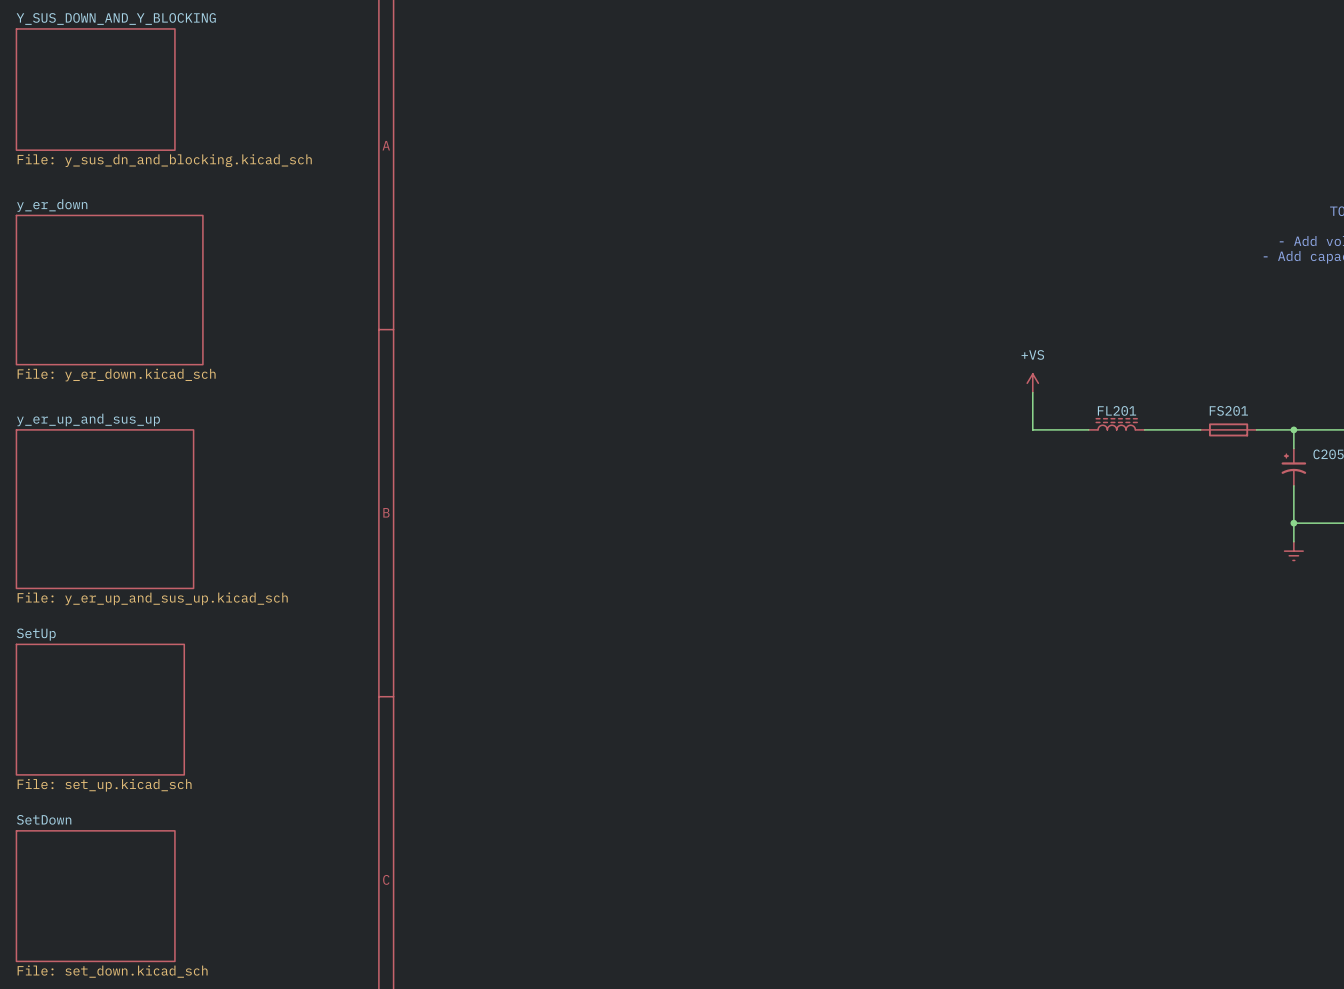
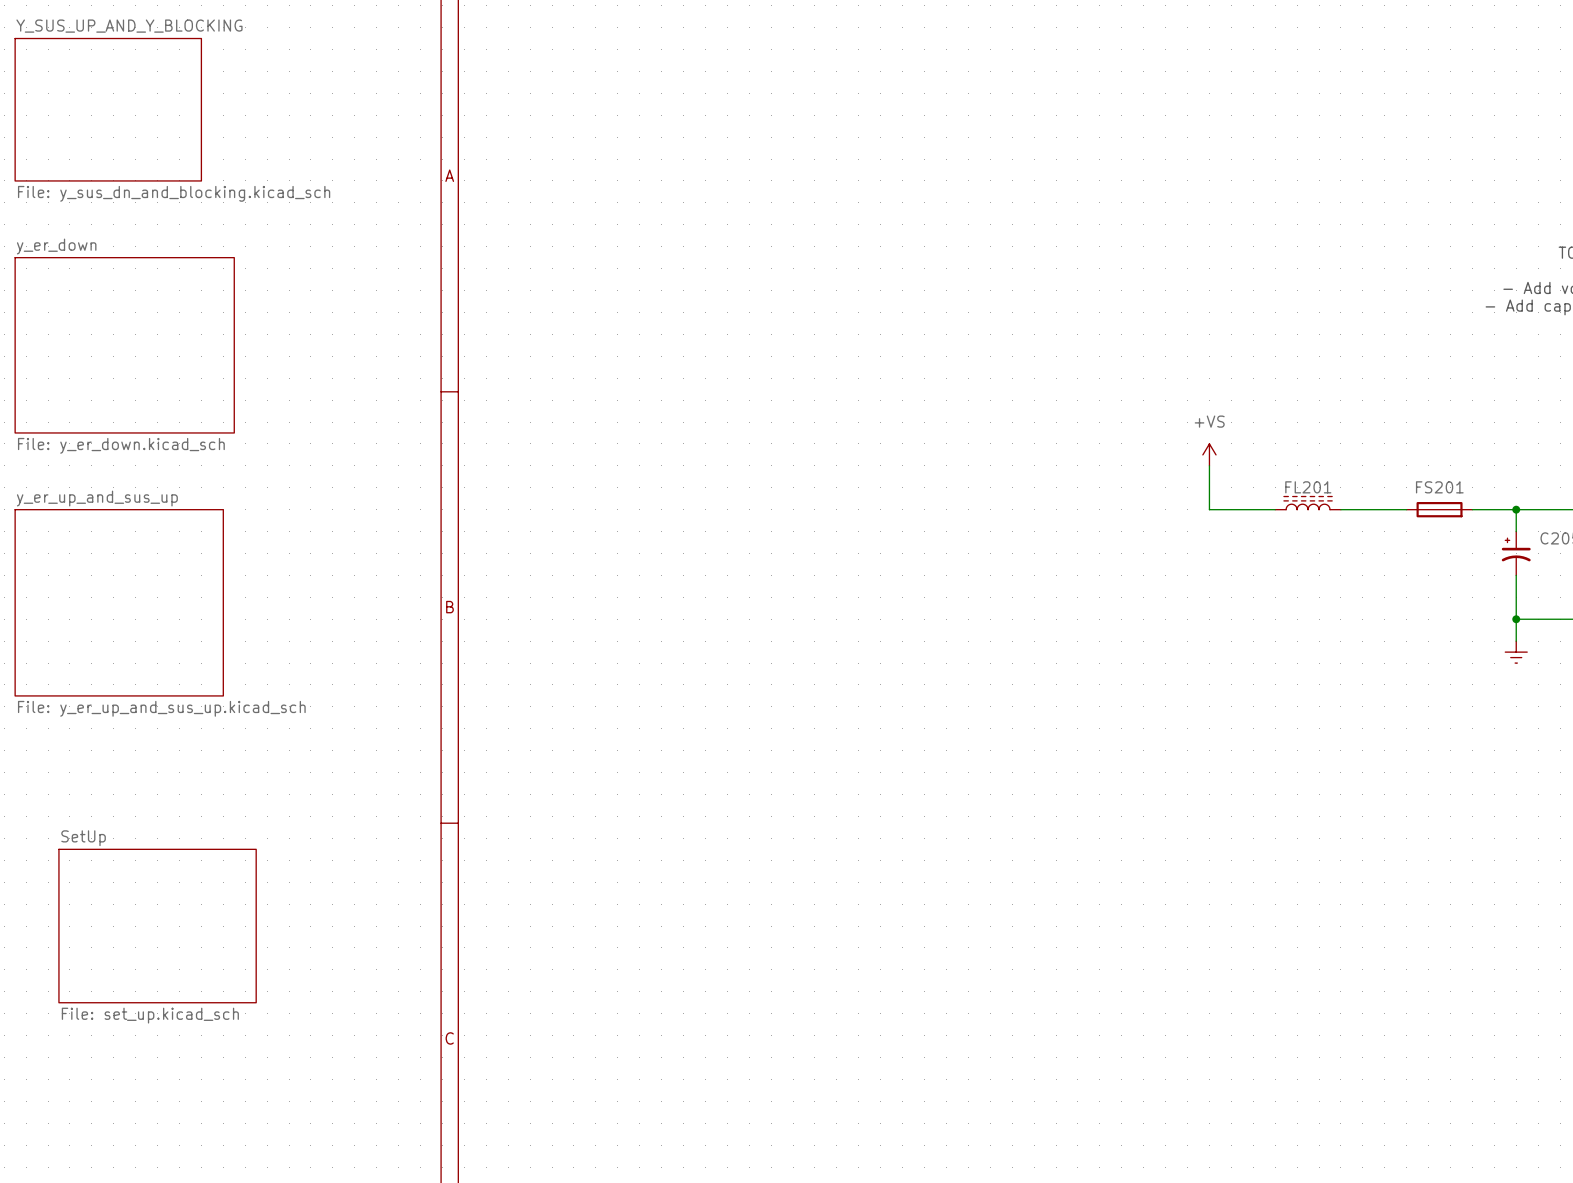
sheet Y_SUS_DOWN_AND_Y_BLOCKING name: Y_SUS_DOWN_AND_Y_BLOCKING (116, 18) -> Y_SUS_UP_AND_Y_BLOCKING (129, 26)
sheet SetUp position: (100, 709) -> (157, 926)
sheet SetDown: File: set_down.kicad_sch (95, 896) -> none

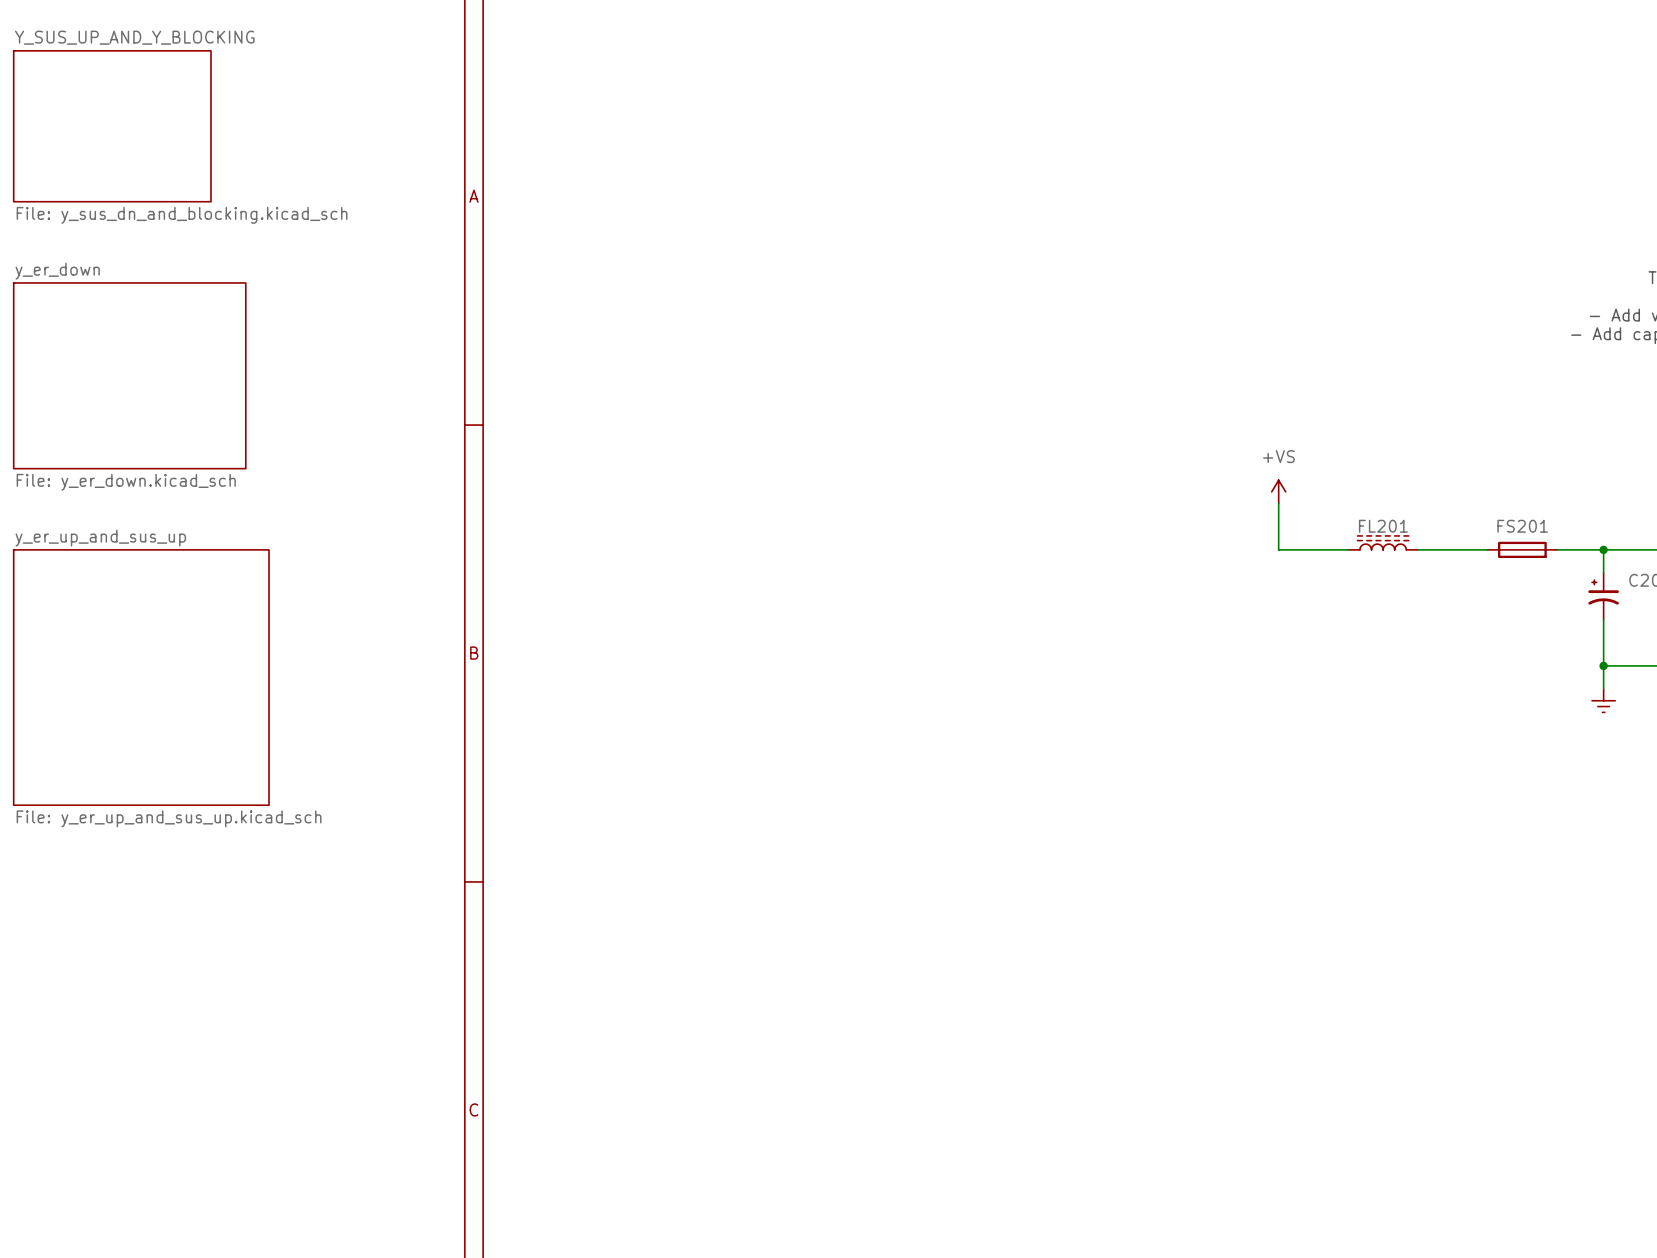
sheet y_er_up_and_sus_up: File: y_er_up_and_sus_up.kicad_sch (119, 602) -> none
sheet y_er_up_and_sus_up: none -> File: y_er_up_and_sus_up.kicad_sch (141, 677)
sheet SetUp: File: set_up.kicad_sch (157, 926) -> none

